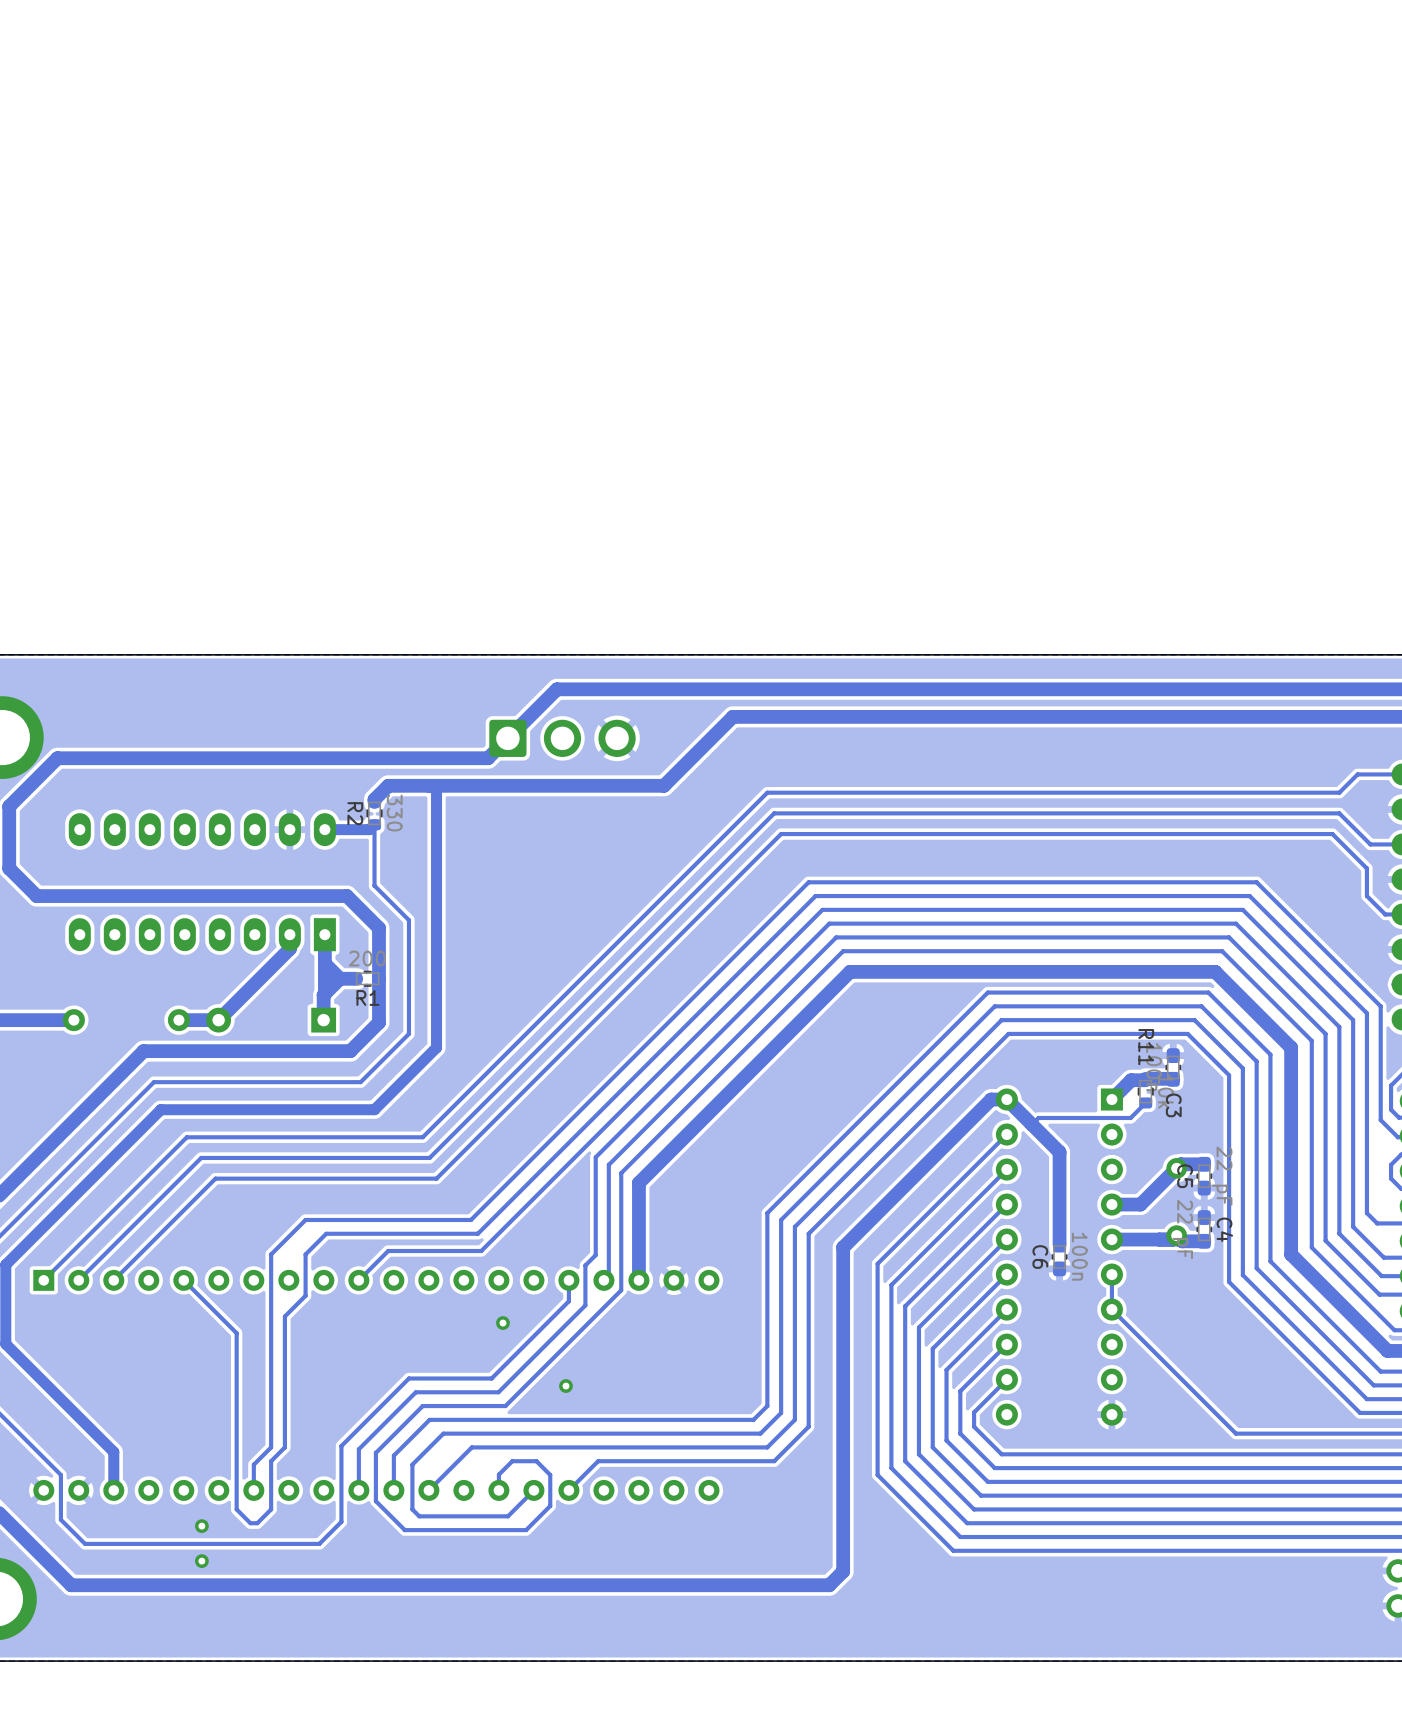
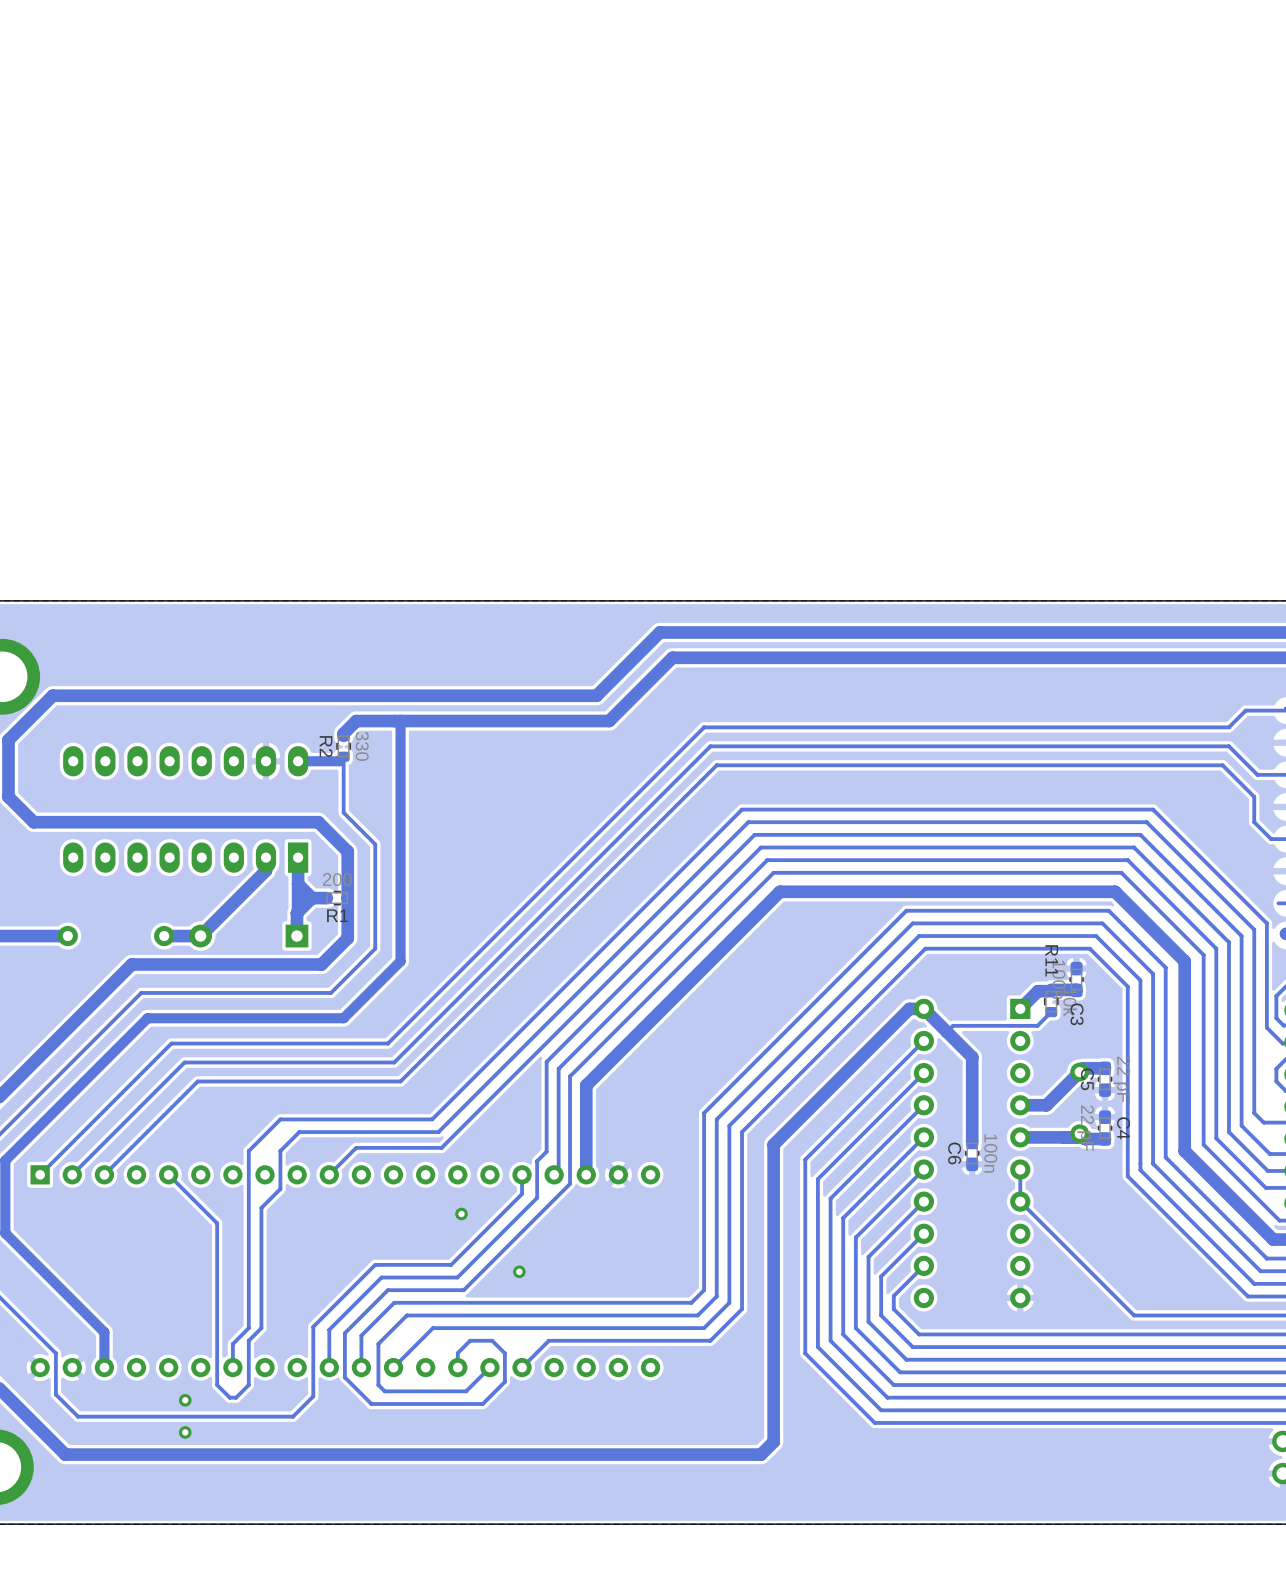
track: (719, 689) (556, 689) (488, 758) -> (659, 632) (596, 695) (447, 695)
part: (562, 738) -> none

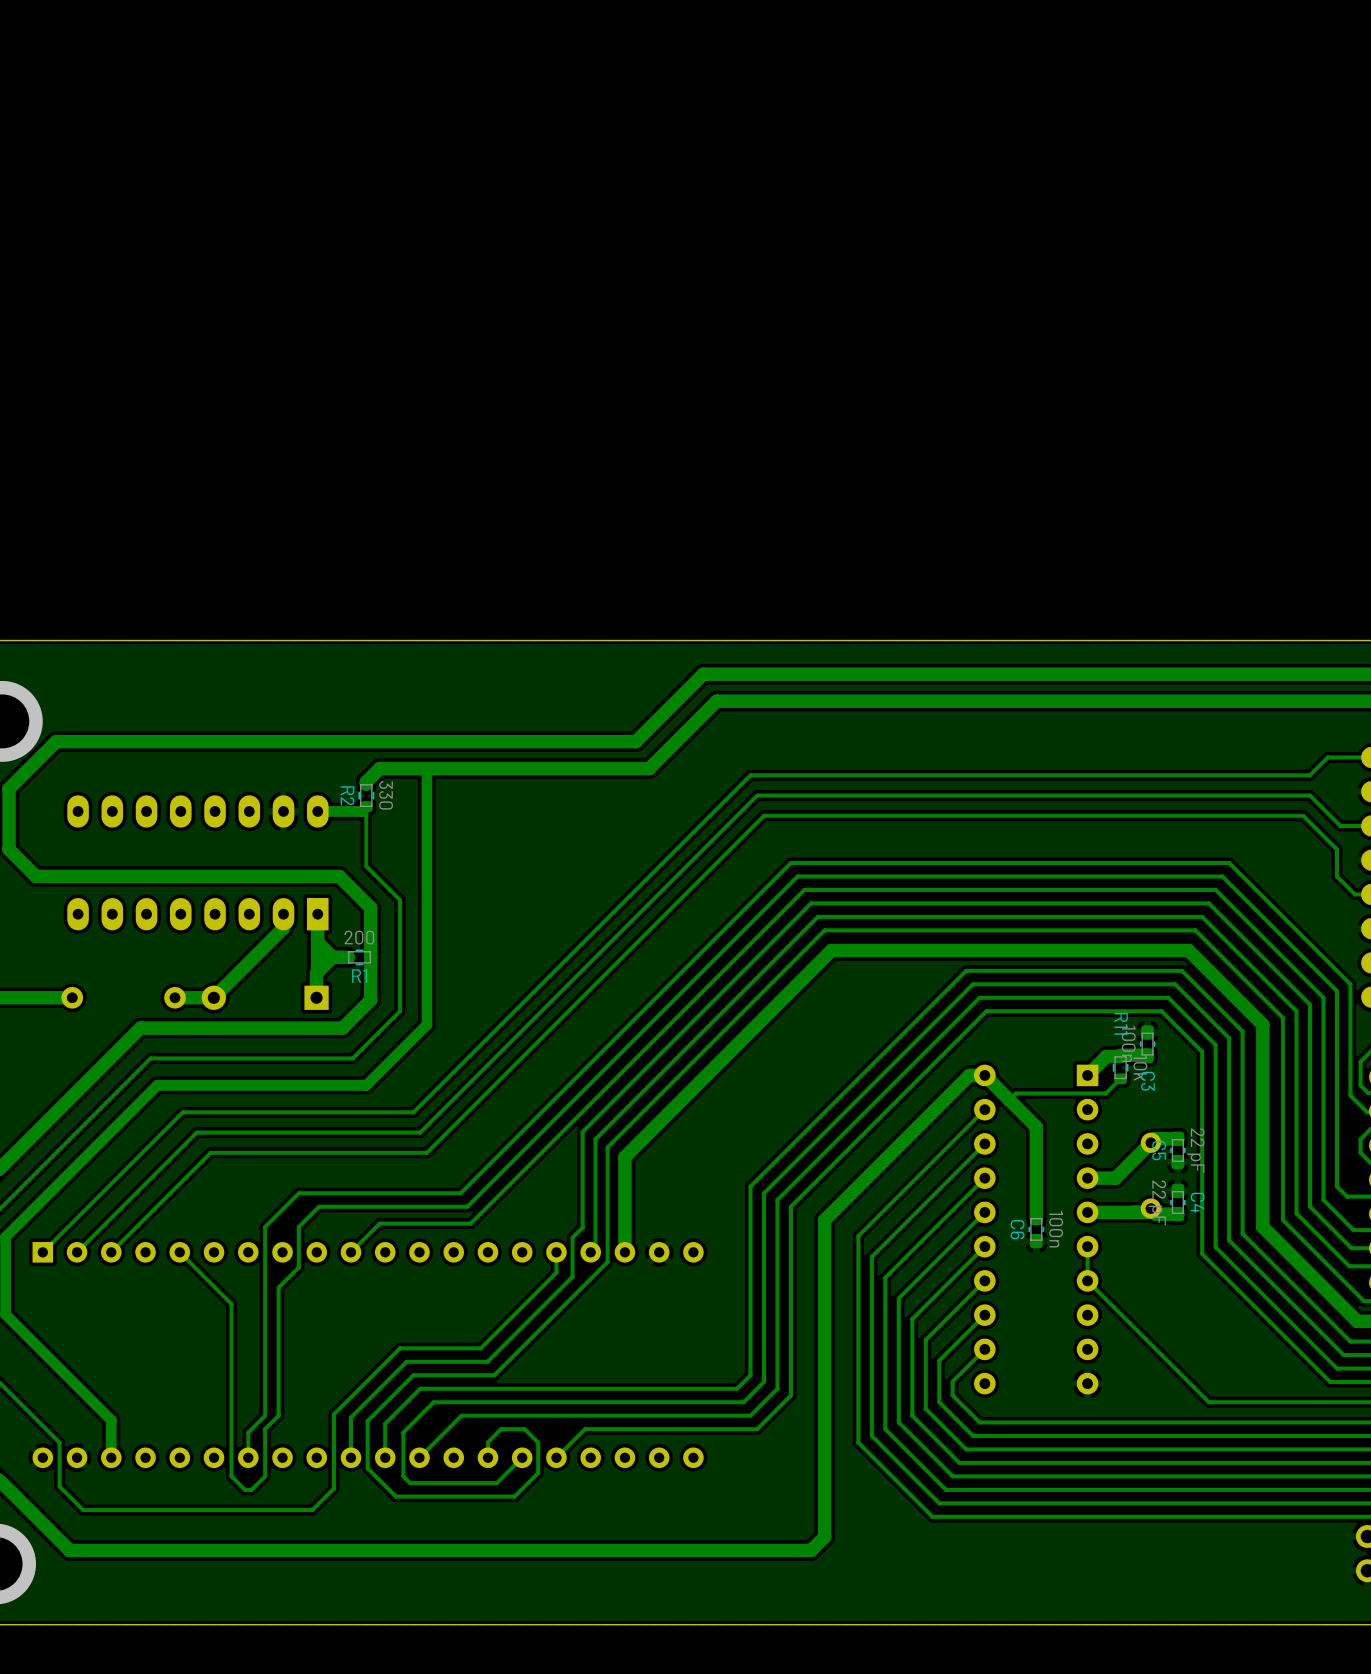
via: (461, 1213) -> none
via: (519, 1271) -> none
via: (185, 1400) -> none
via: (185, 1432) -> none

